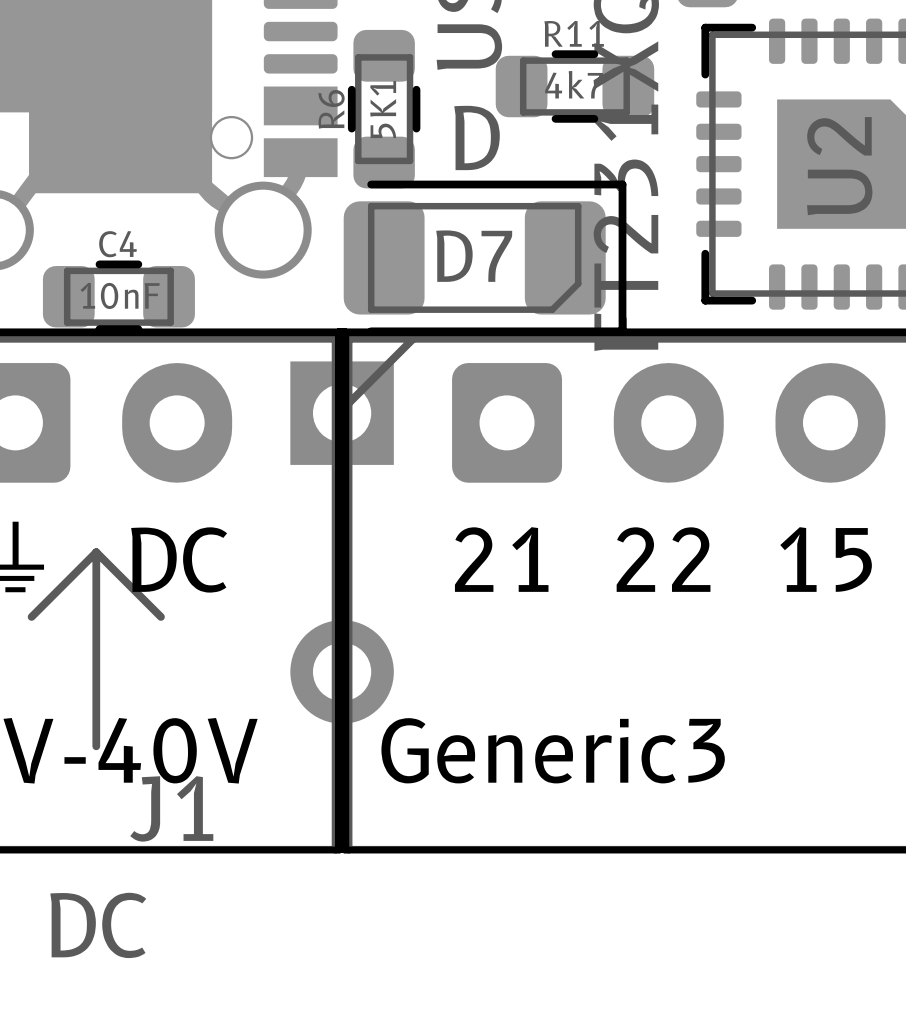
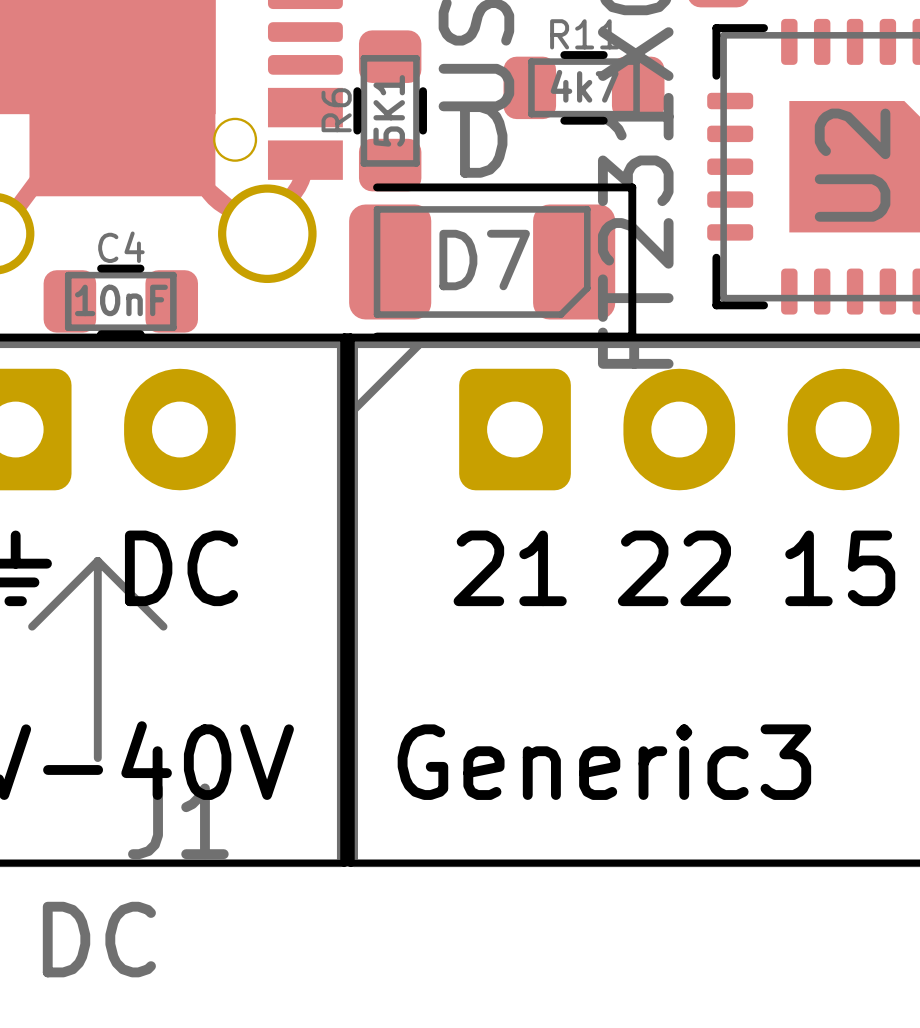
part: (342, 542) -> none

